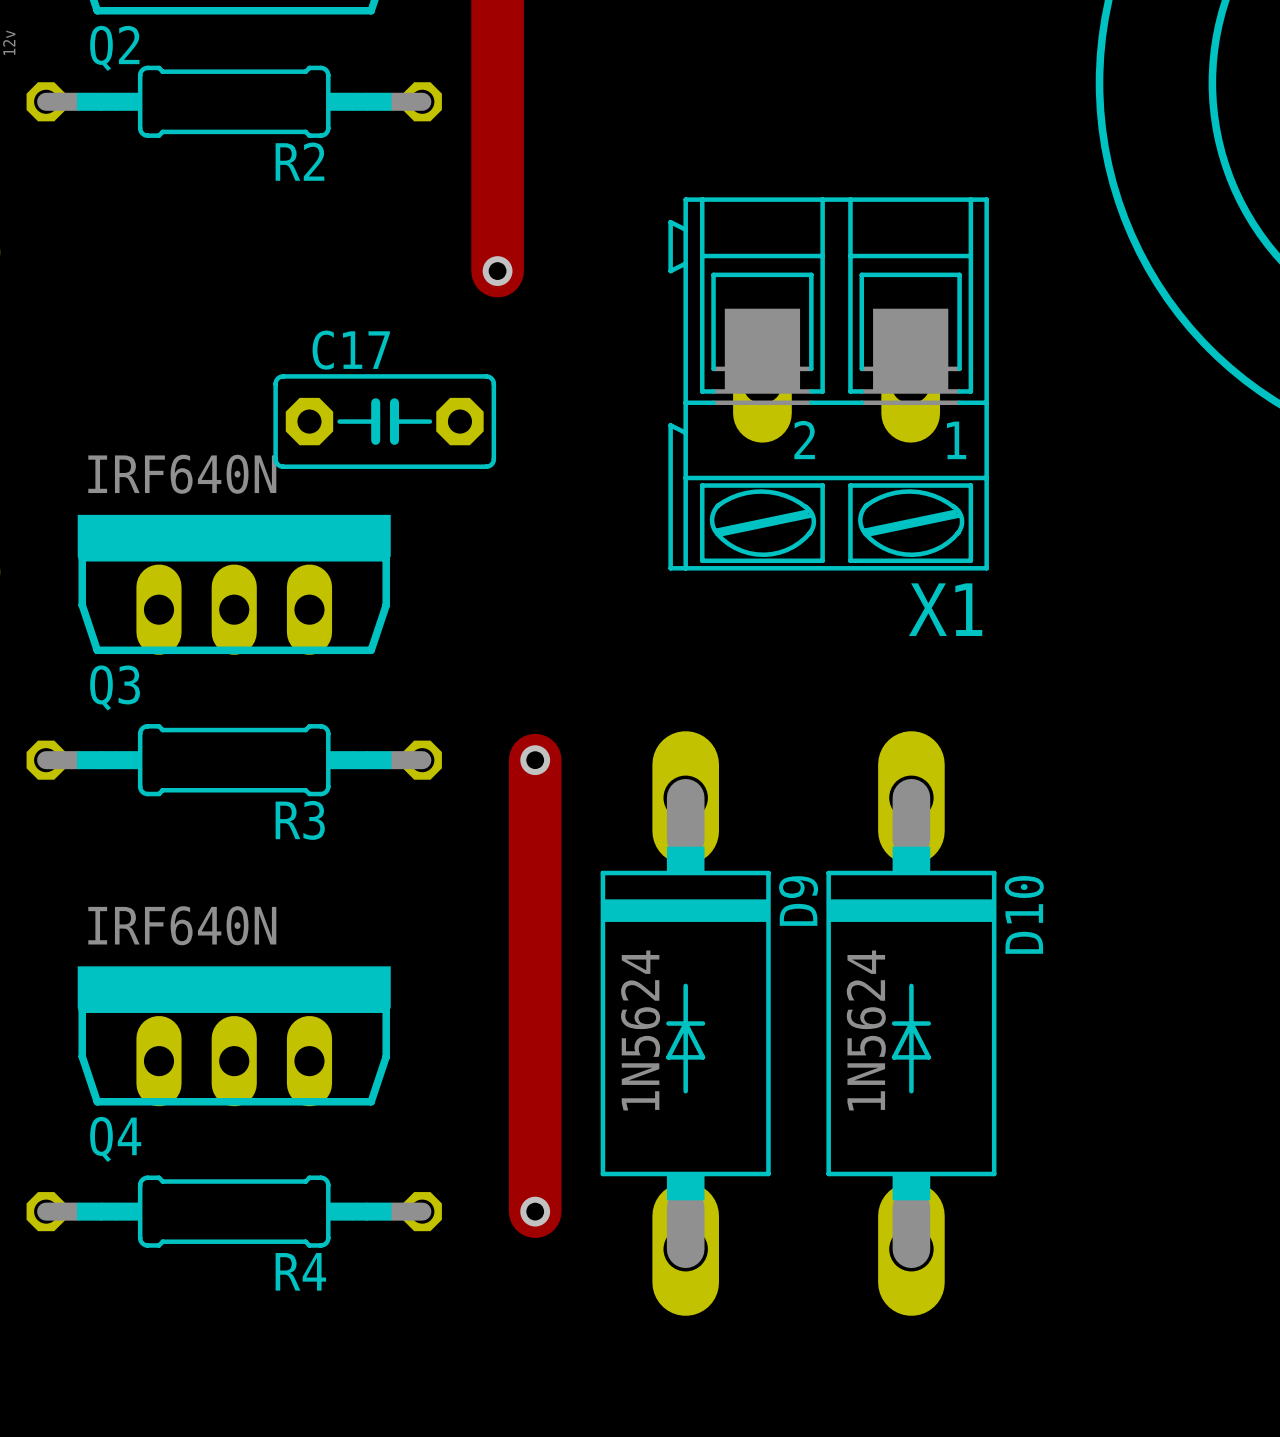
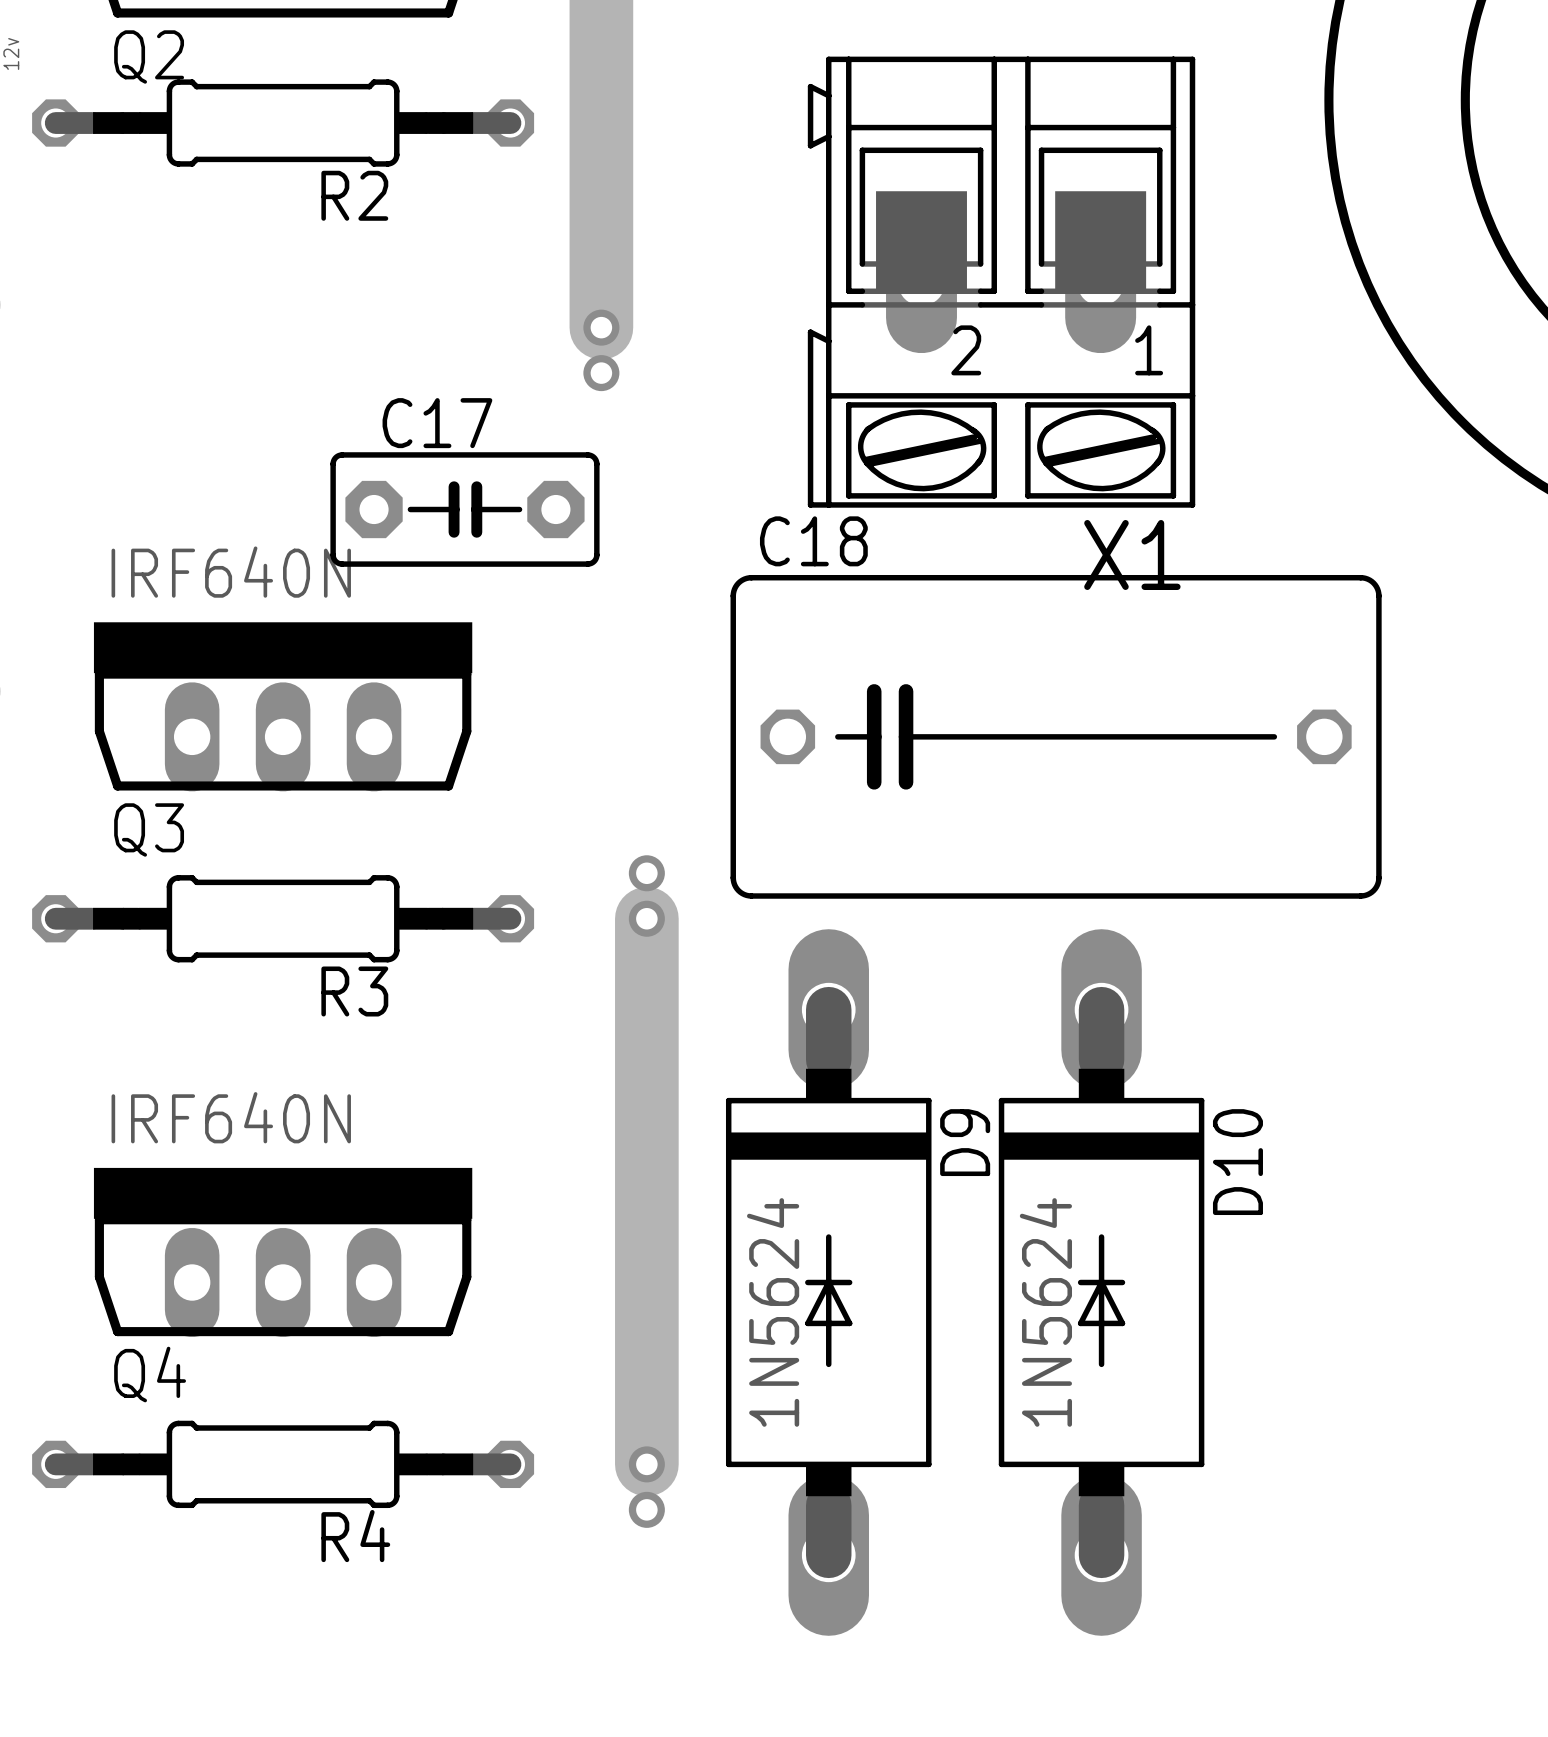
via: none -> (601, 373)
X1 position: (828, 383) -> (1001, 282)
C18: none -> (1056, 736)
via: none -> (646, 873)
D9 position: (685, 1023) -> (828, 1282)
D10 position: (911, 1023) -> (1101, 1282)
via: none -> (646, 1509)

